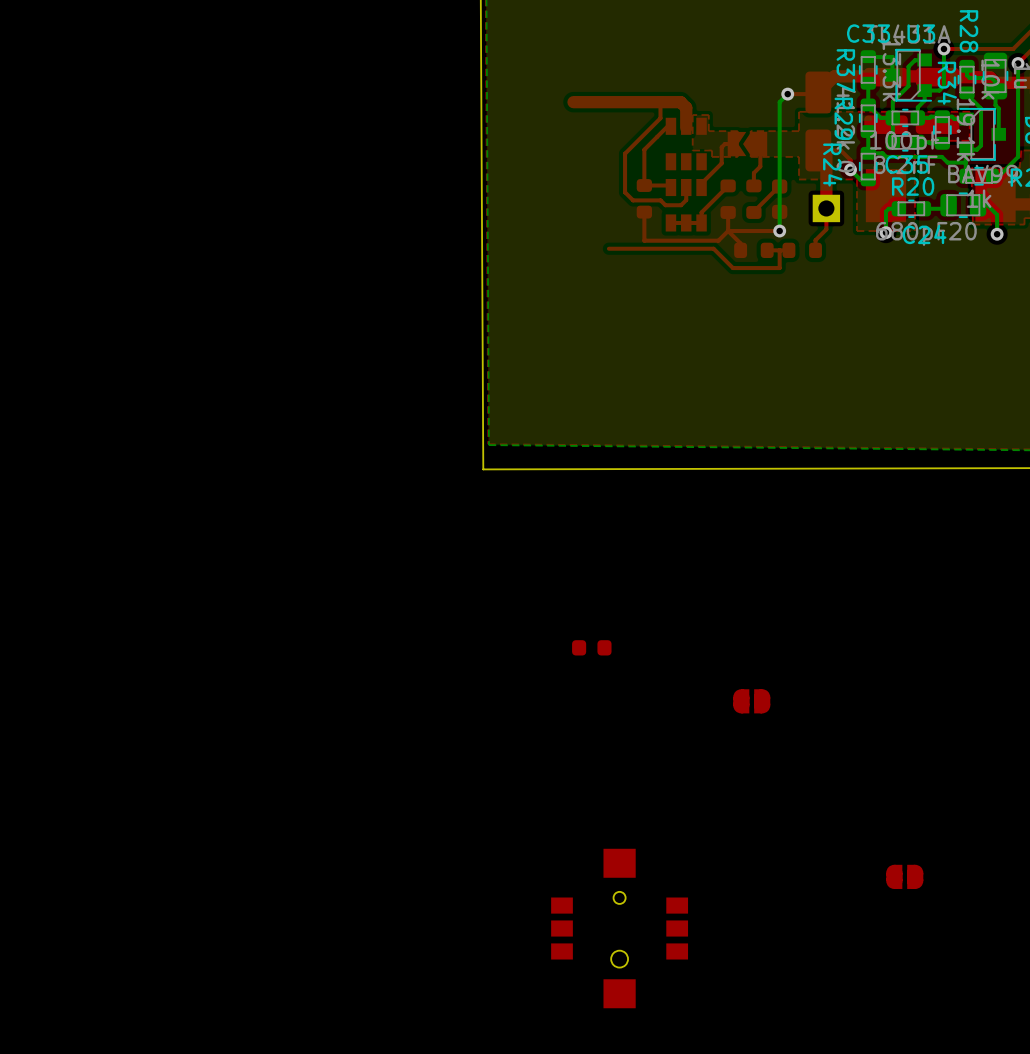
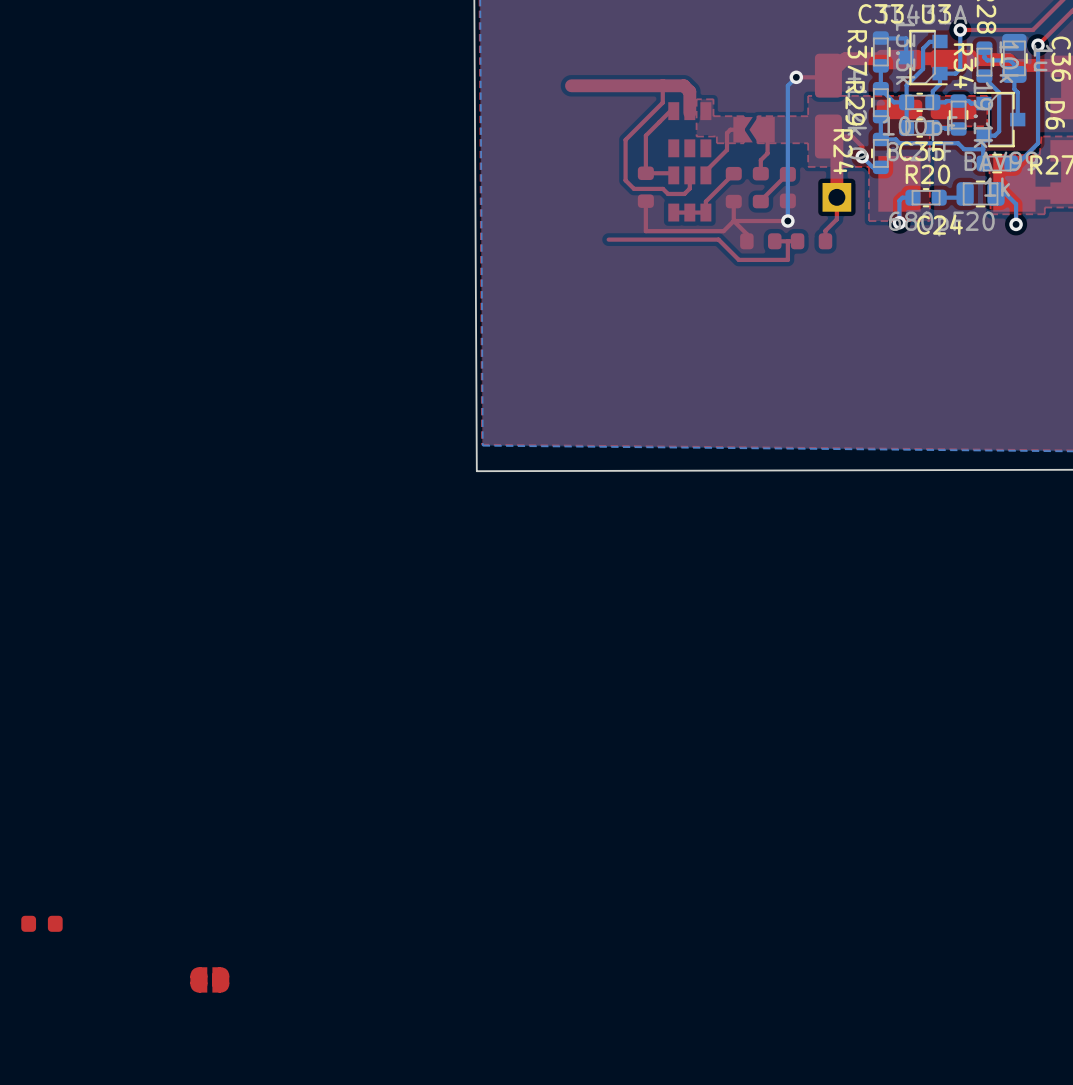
part: (591, 647) -> none
part: (751, 701) -> none
part: (904, 876) -> none
part: none -> (41, 923)
part: (619, 928) -> none
part: none -> (209, 979)

